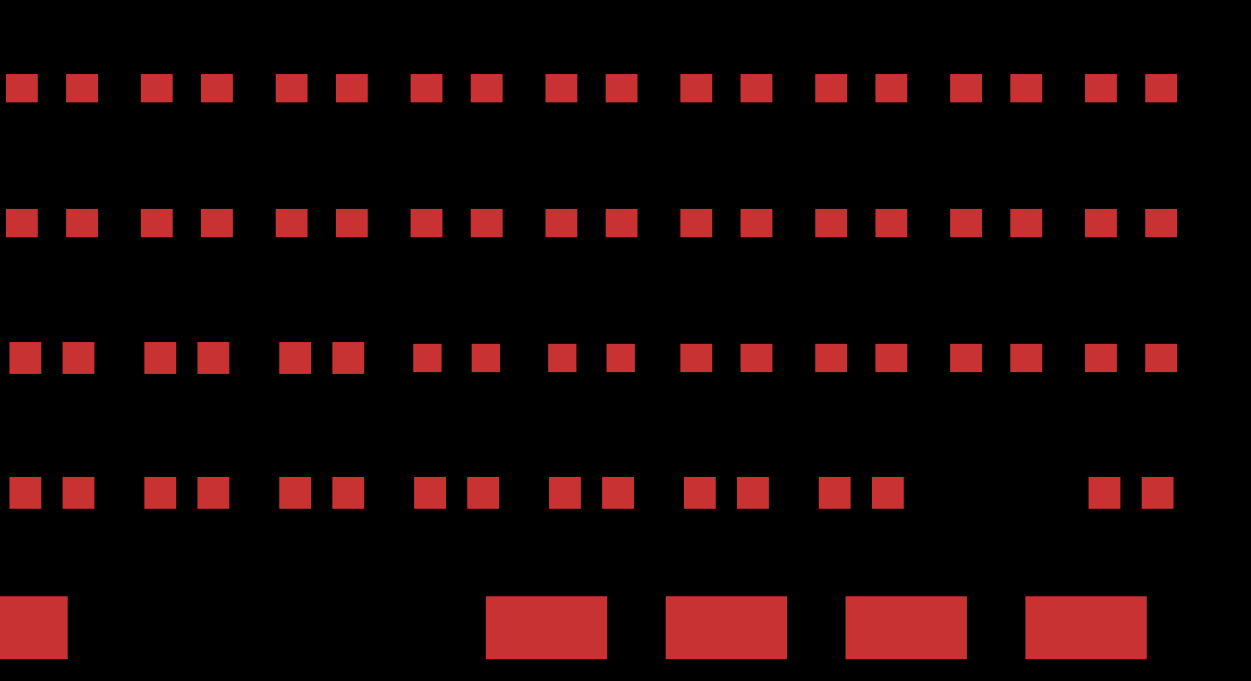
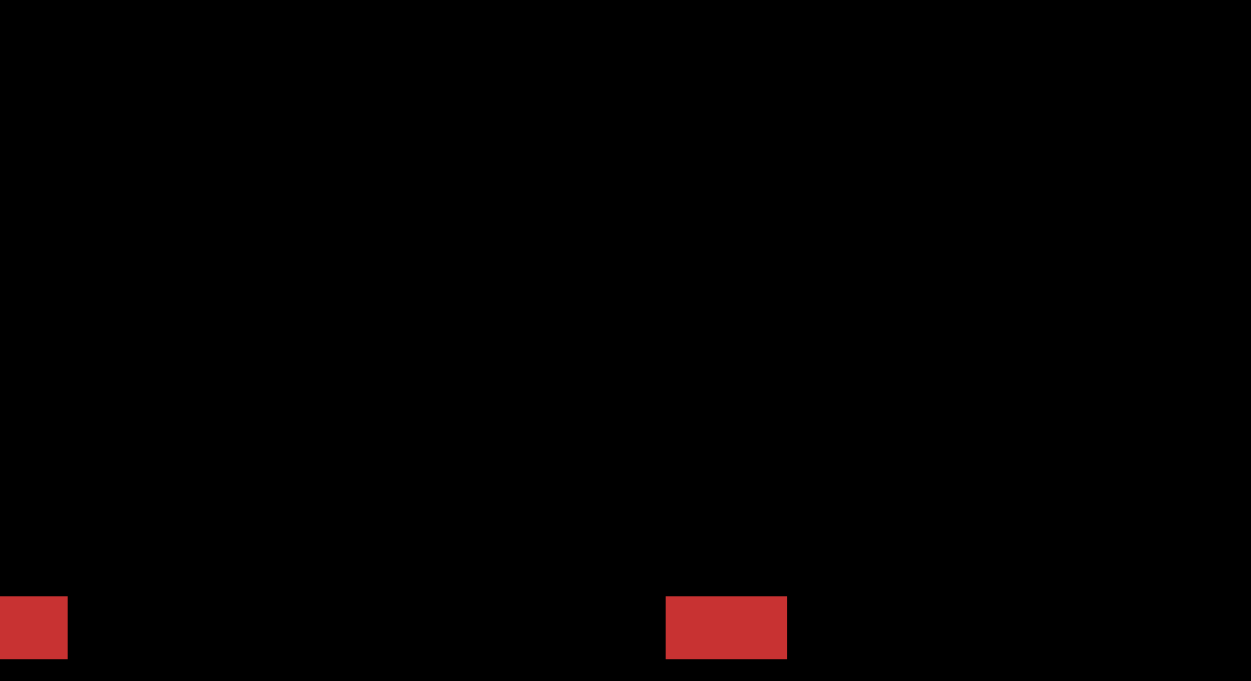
part: (51, 88) -> none
part: (186, 88) -> none
part: (321, 88) -> none
part: (456, 88) -> none
part: (591, 88) -> none
part: (726, 88) -> none
part: (861, 88) -> none
part: (996, 88) -> none
part: (1131, 88) -> none
part: (51, 223) -> none
part: (186, 223) -> none
part: (321, 223) -> none
part: (456, 223) -> none
part: (591, 223) -> none
part: (726, 223) -> none
part: (861, 223) -> none
part: (996, 223) -> none
part: (1131, 223) -> none
part: (51, 357) -> none
part: (186, 357) -> none
part: (321, 357) -> none
part: (456, 357) -> none
part: (591, 357) -> none
part: (726, 357) -> none
part: (861, 357) -> none
part: (996, 357) -> none
part: (1131, 357) -> none
part: (51, 492) -> none
part: (186, 492) -> none
part: (321, 492) -> none
part: (456, 492) -> none
part: (591, 492) -> none
part: (726, 492) -> none
part: (861, 492) -> none
part: (1131, 492) -> none
part: (546, 627) -> none
part: (906, 627) -> none
part: (1086, 627) -> none

